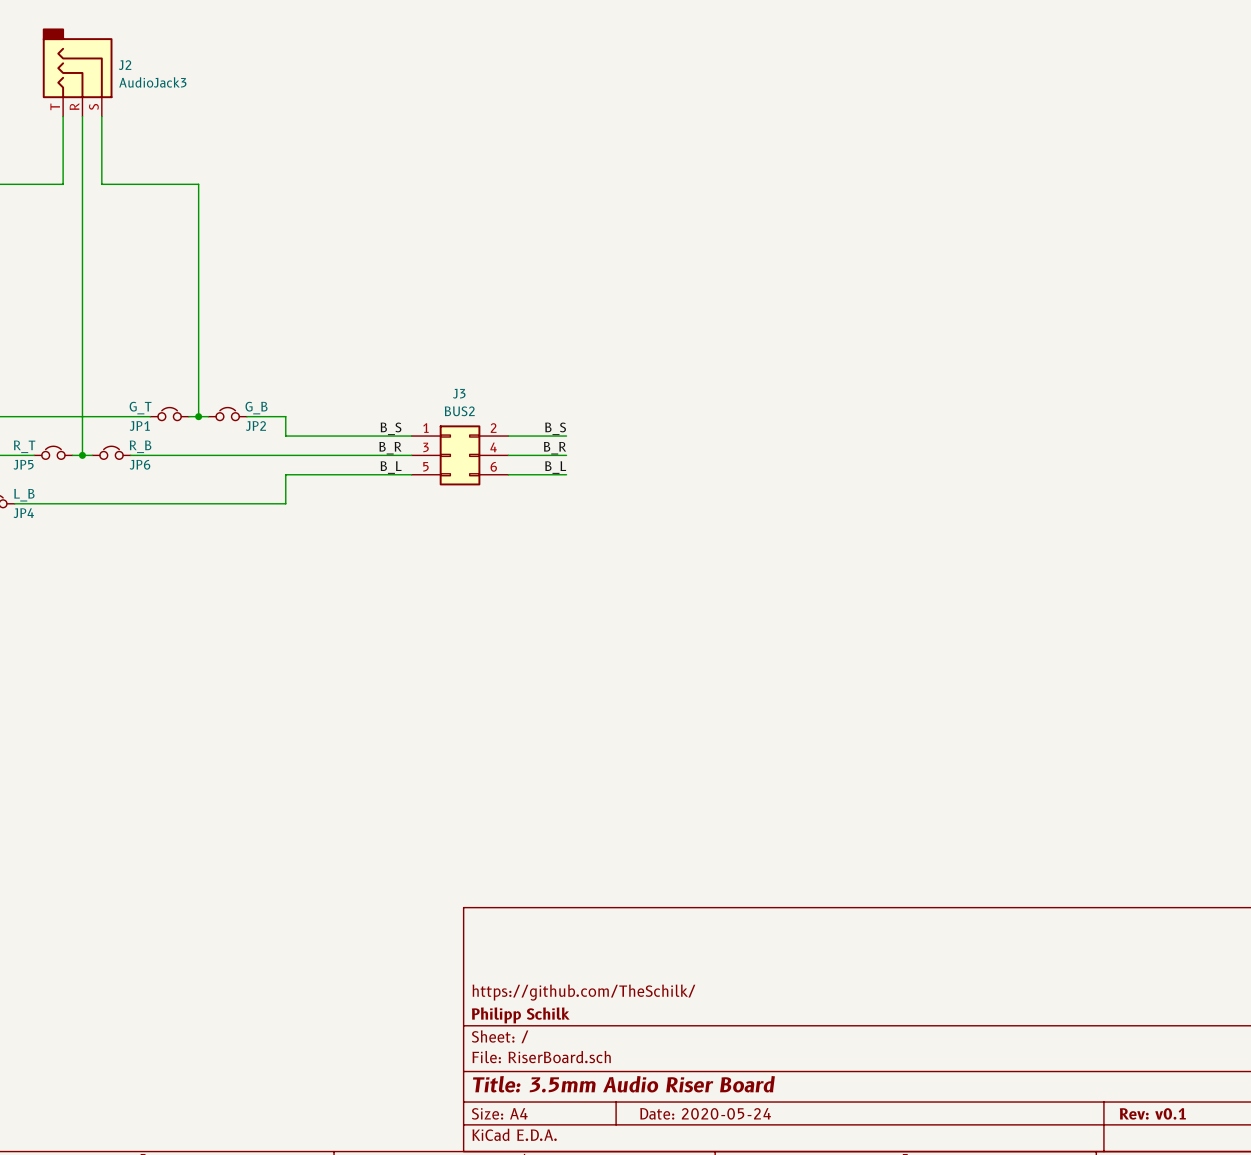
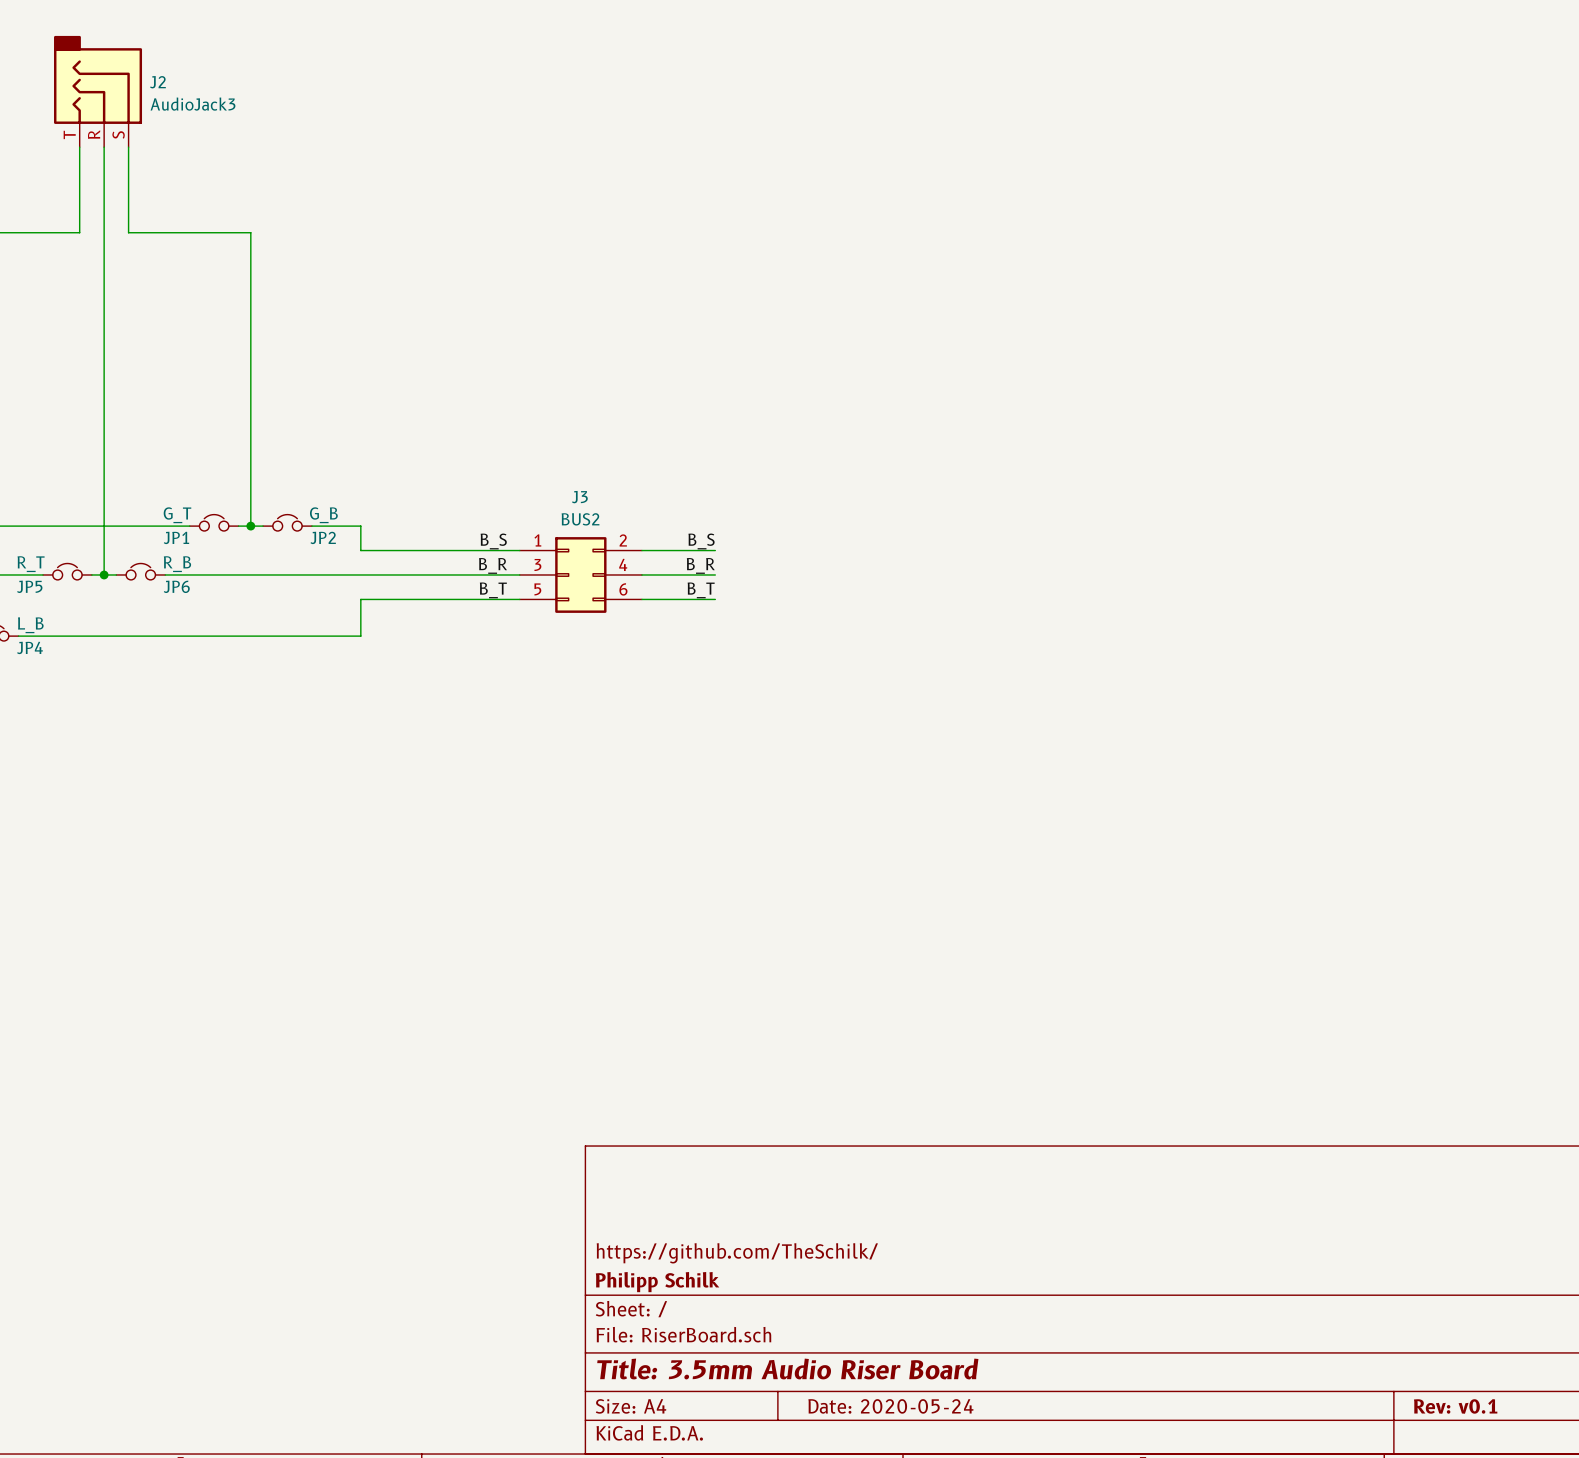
label: B_L (391, 467) -> B_T (493, 590)
label: B_L (555, 467) -> B_T (701, 590)

